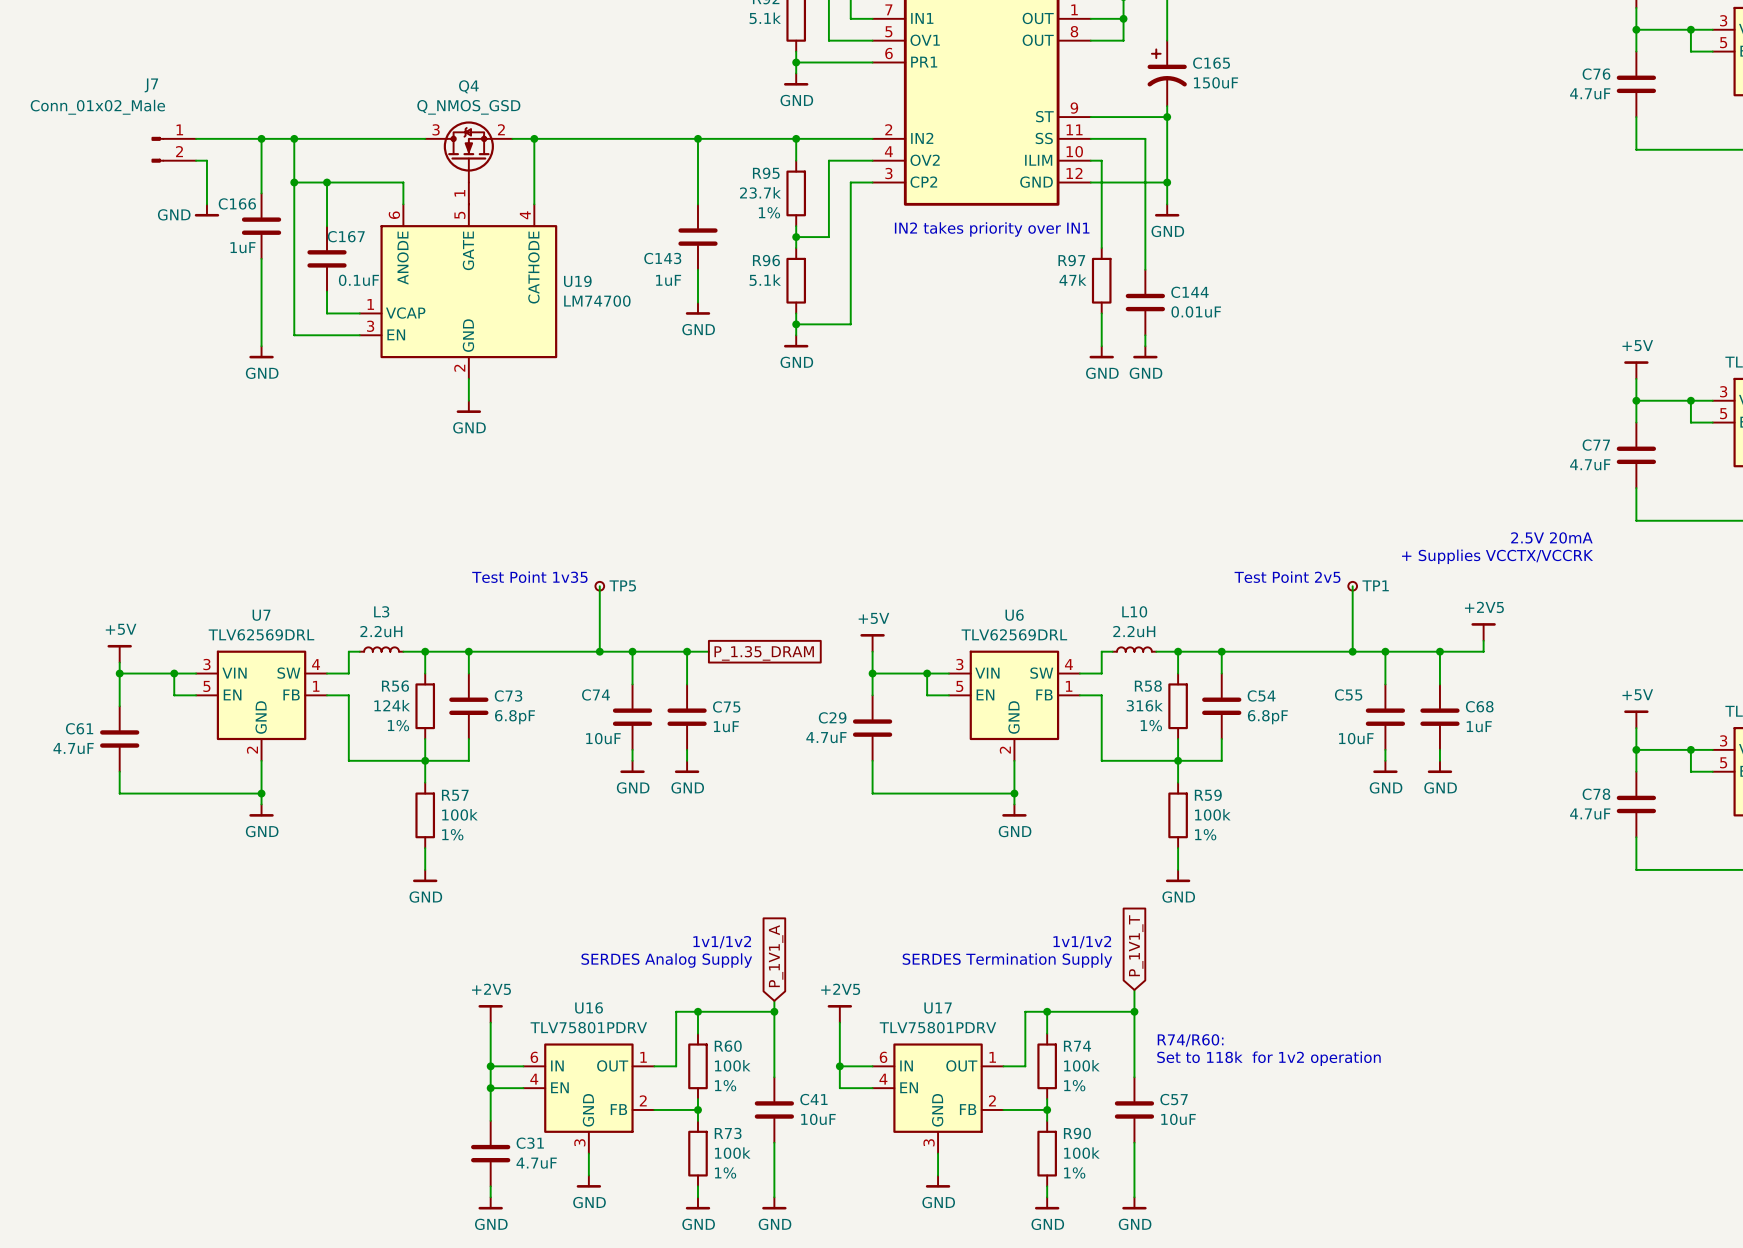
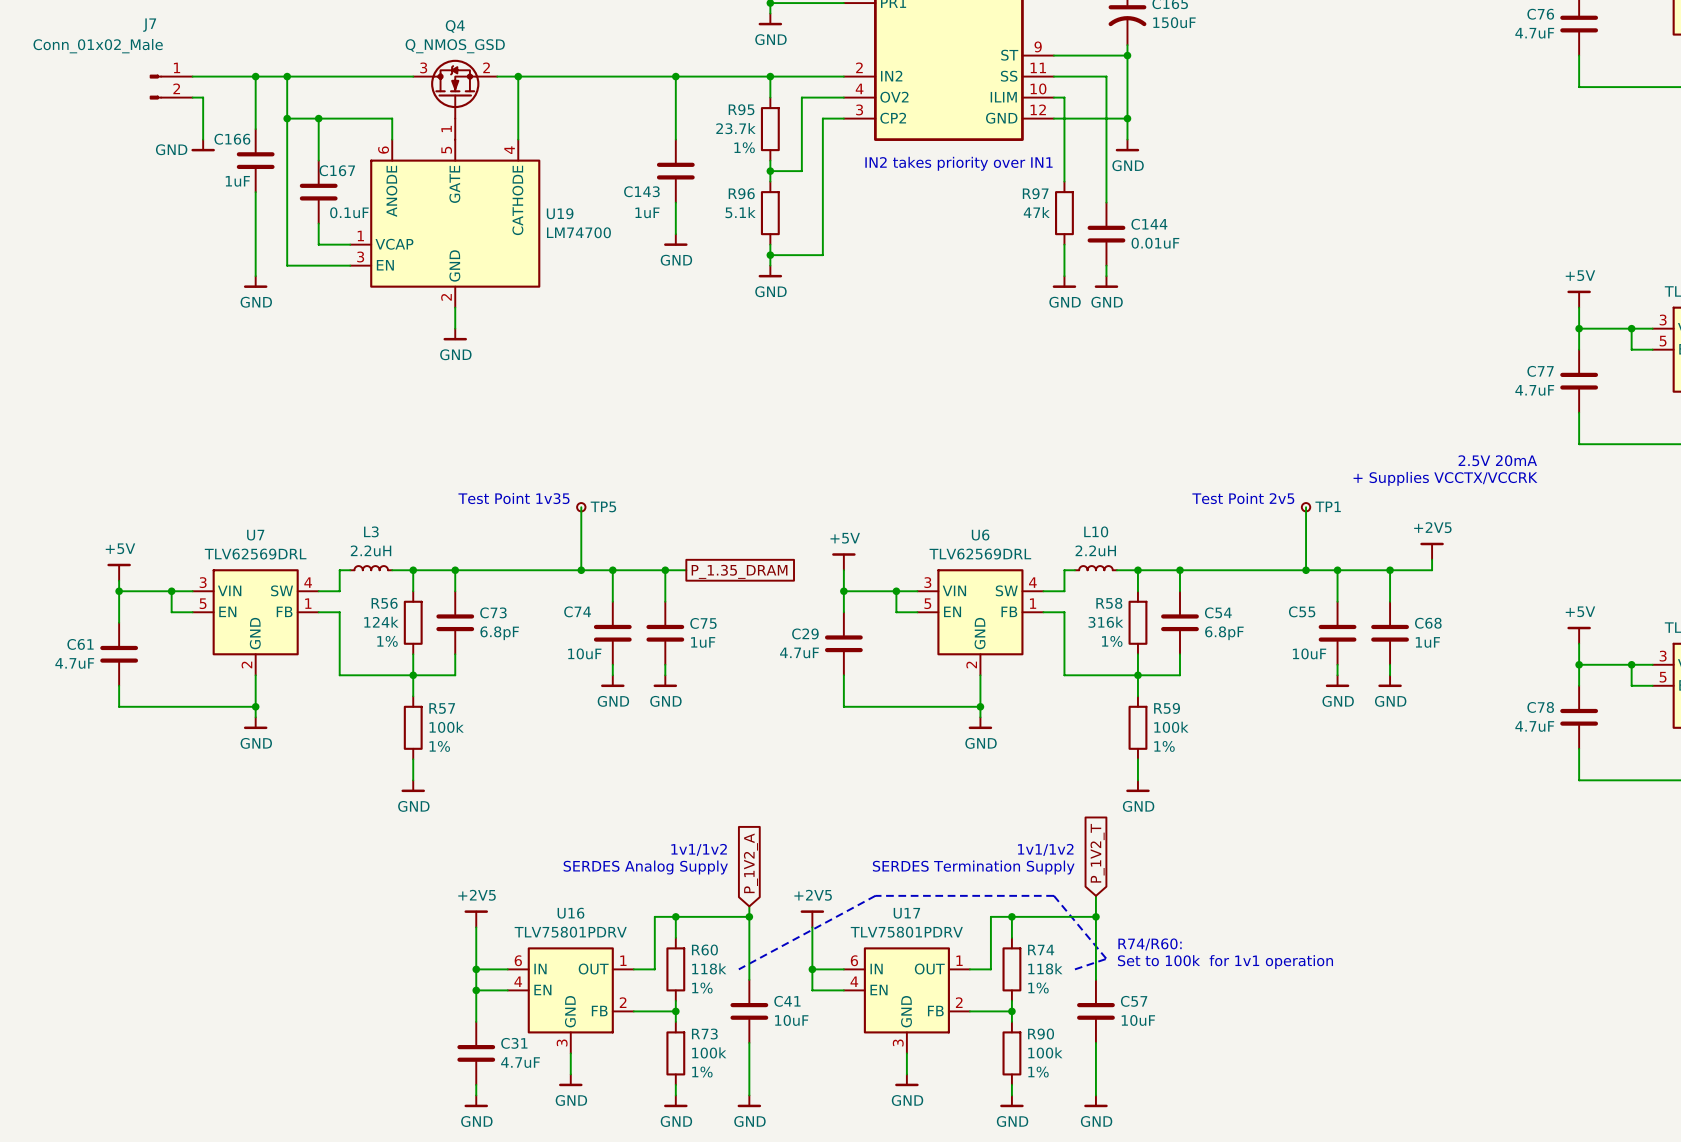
global label: P_1V1_T (1136, 945) -> P_1V2_T (1097, 853)
global label: P_1V1_A (776, 956) -> P_1V2_A (750, 863)
text: Set to 118k for 1v2 operation (1268, 1058) -> Set to 100k for 1v1 operation (1225, 962)
R60 value: 100k (732, 1065) -> 118k (709, 968)
R74 value: 100k (1081, 1065) -> 118k (1045, 968)
line: none -> (738, 969) (875, 895) (1053, 895) (1106, 958) (1074, 969)

